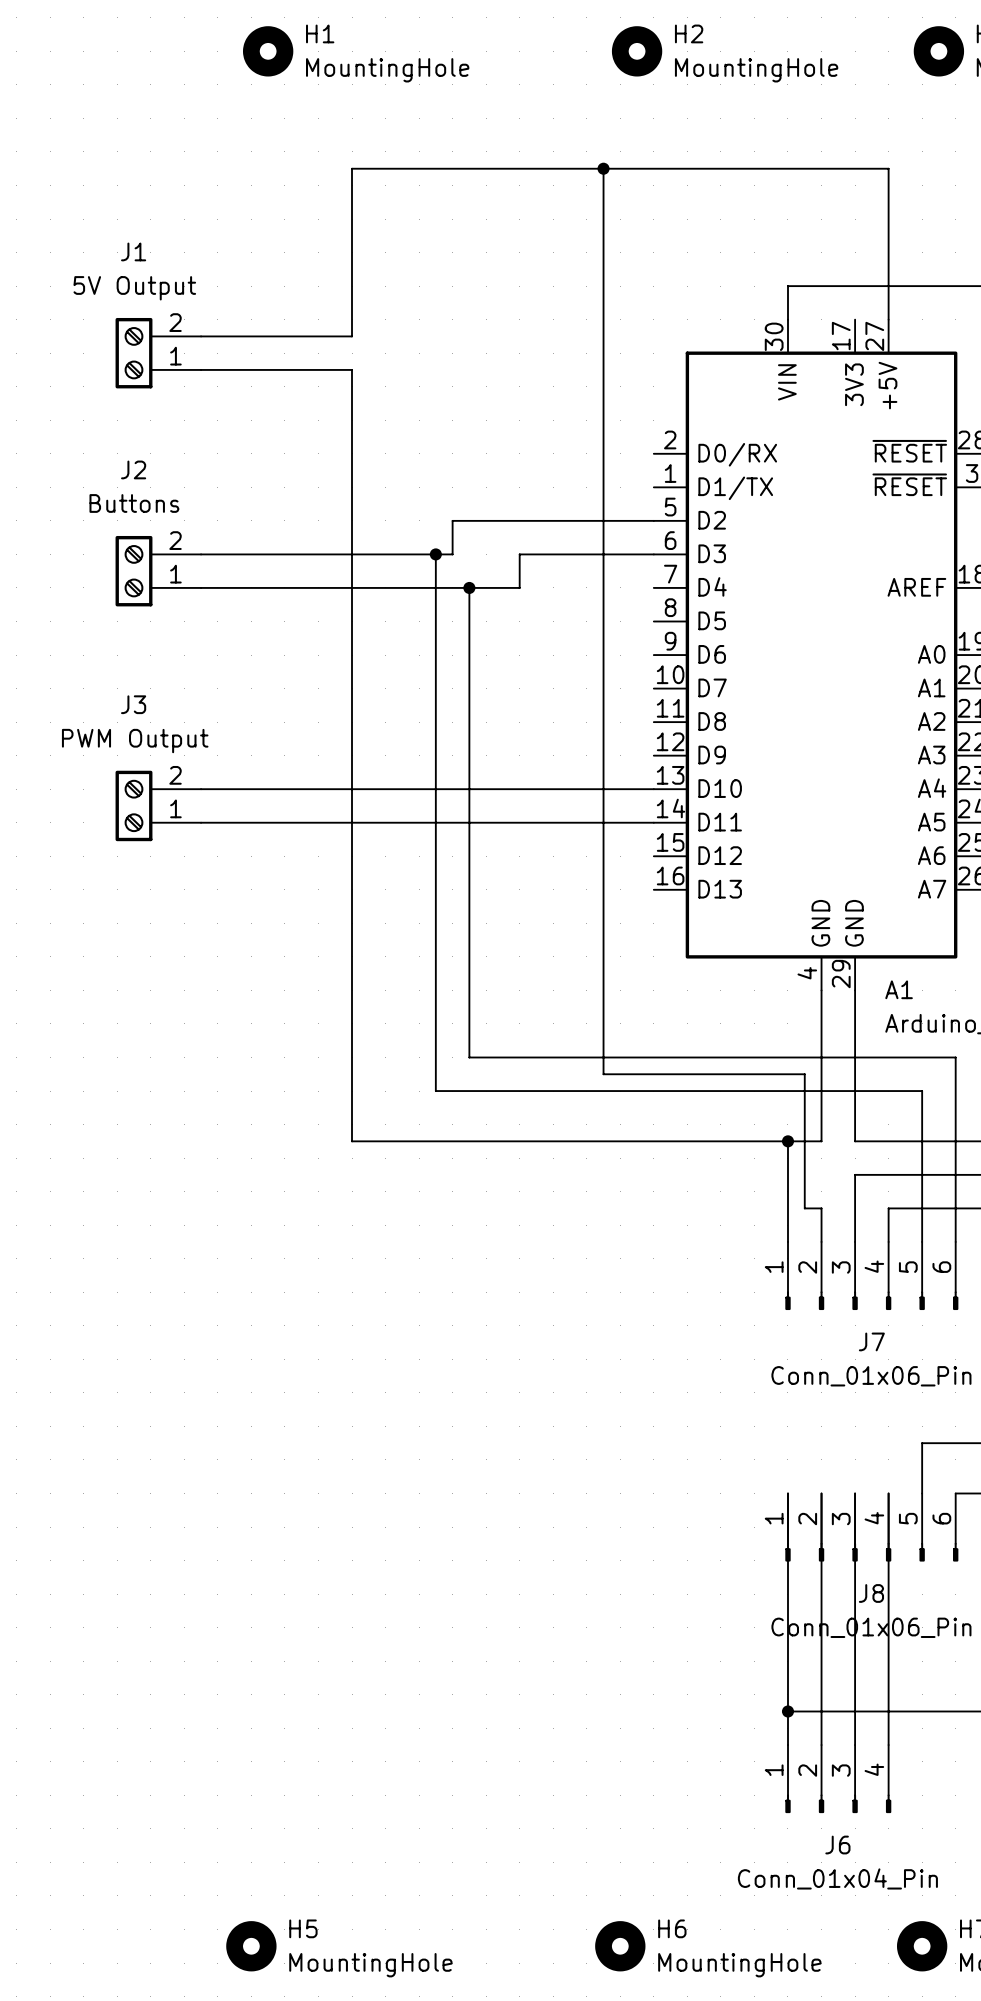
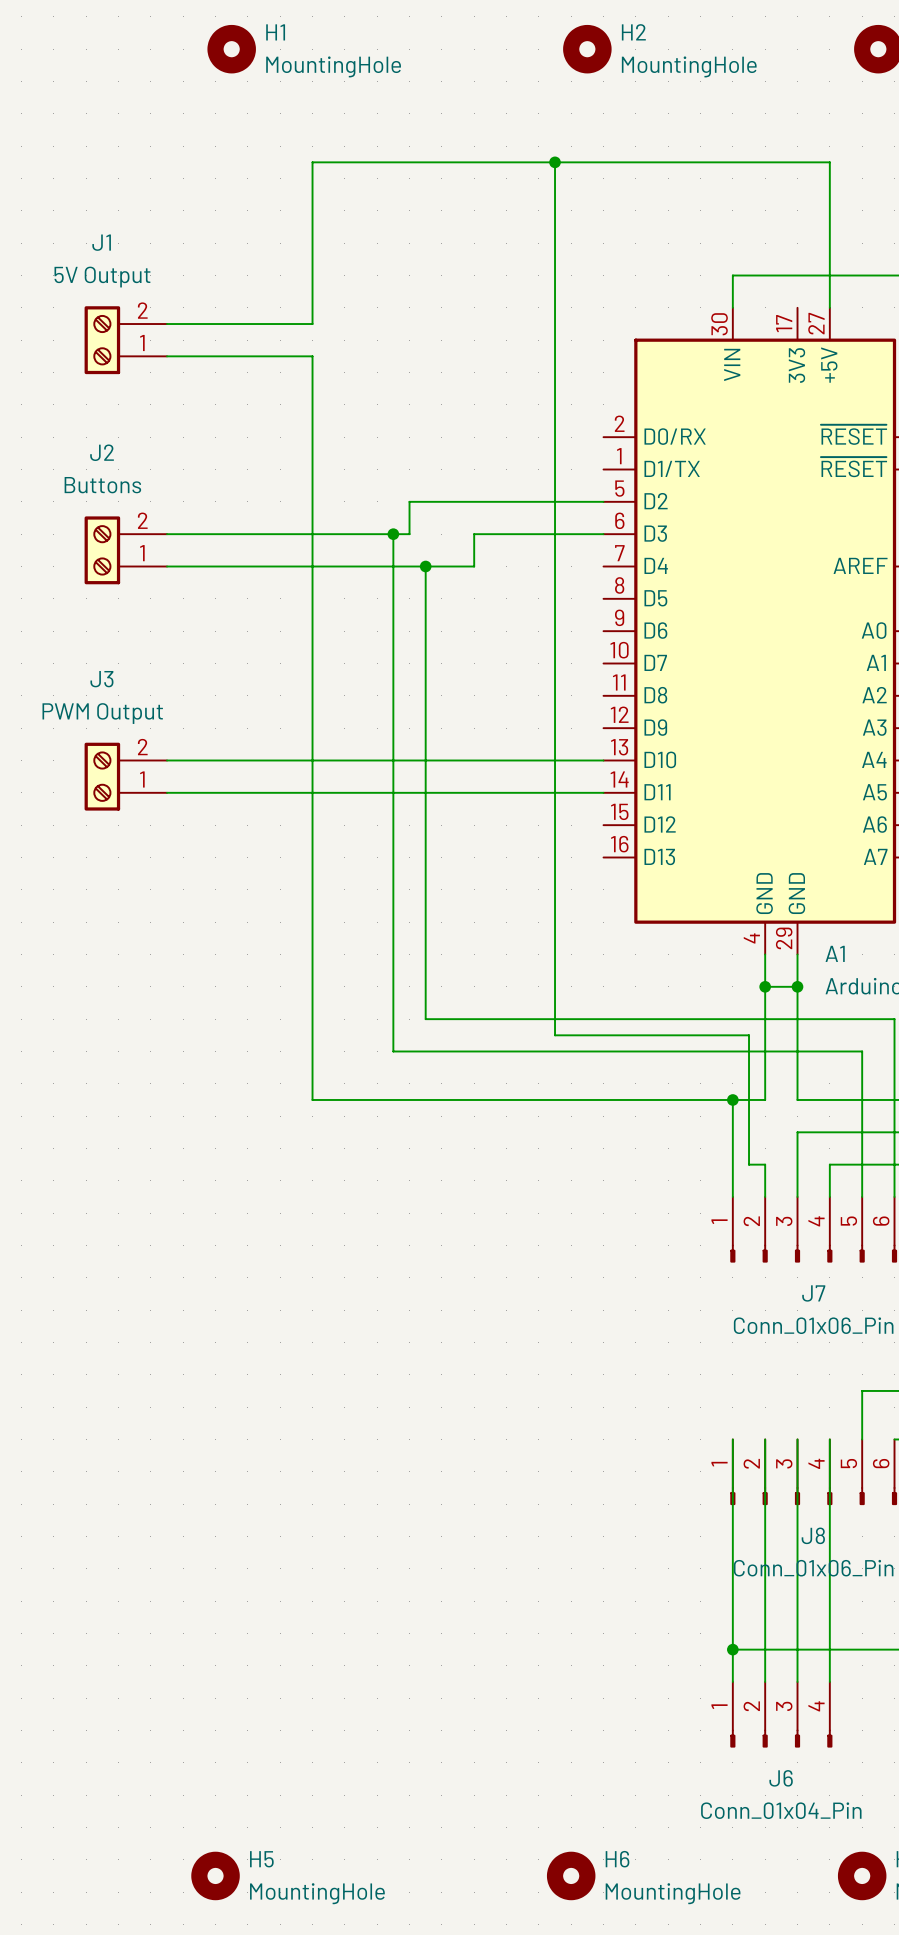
wire: none -> (765, 986) (797, 986)
junction: none -> (765, 986)
junction: none -> (797, 986)

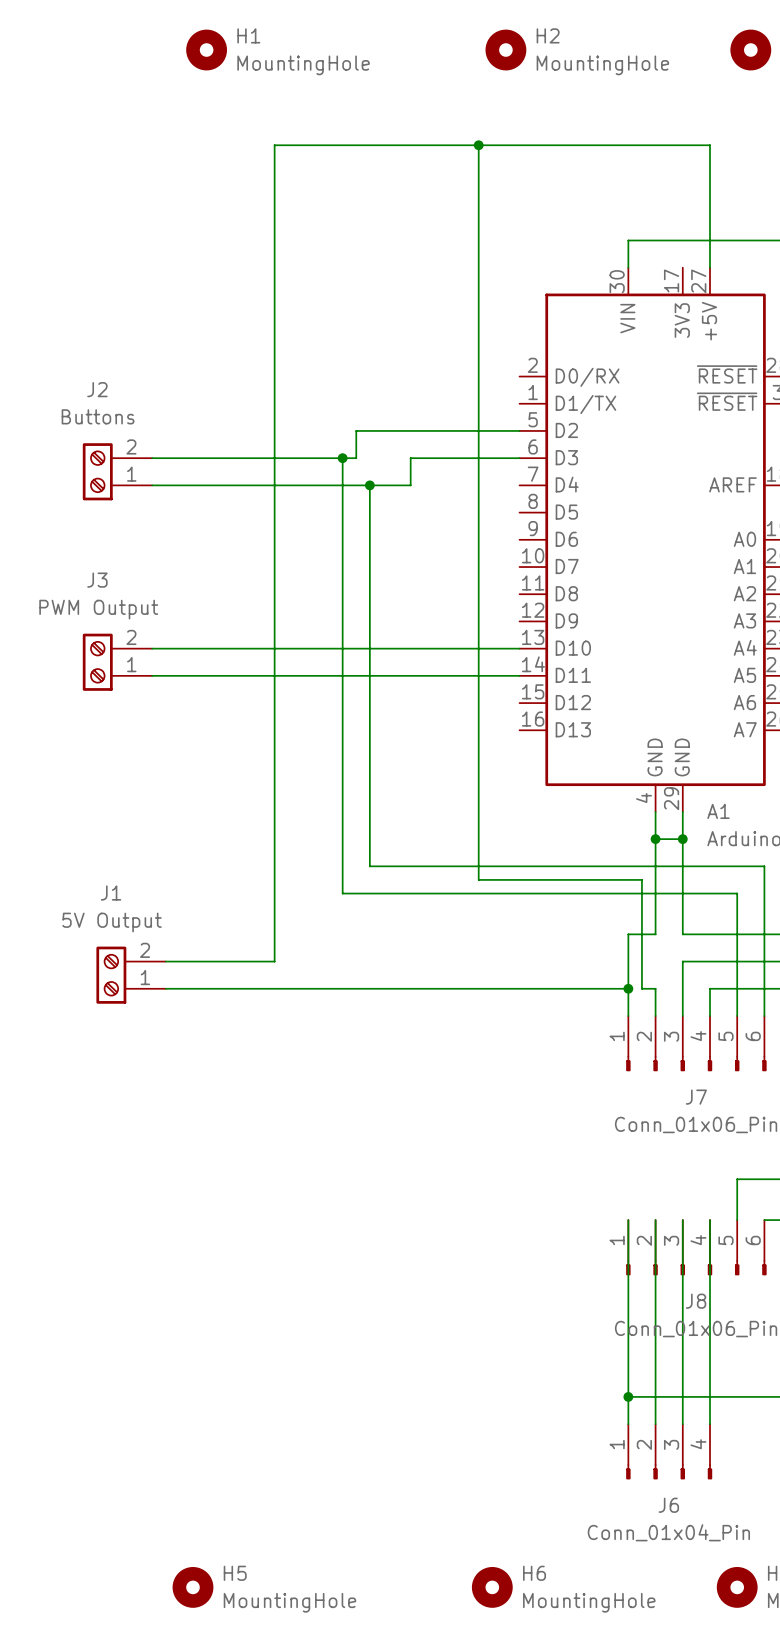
wire: (167, 324) (312, 324) -> (274, 308) (274, 281)
J1 position: (125, 340) -> (131, 975)
wire: (167, 356) (312, 356) -> none
wire: (312, 1099) (732, 1099) -> (274, 934) (274, 961) (165, 961)
junction position: (732, 1099) -> (628, 988)
wire: none -> (165, 988) (628, 988)

